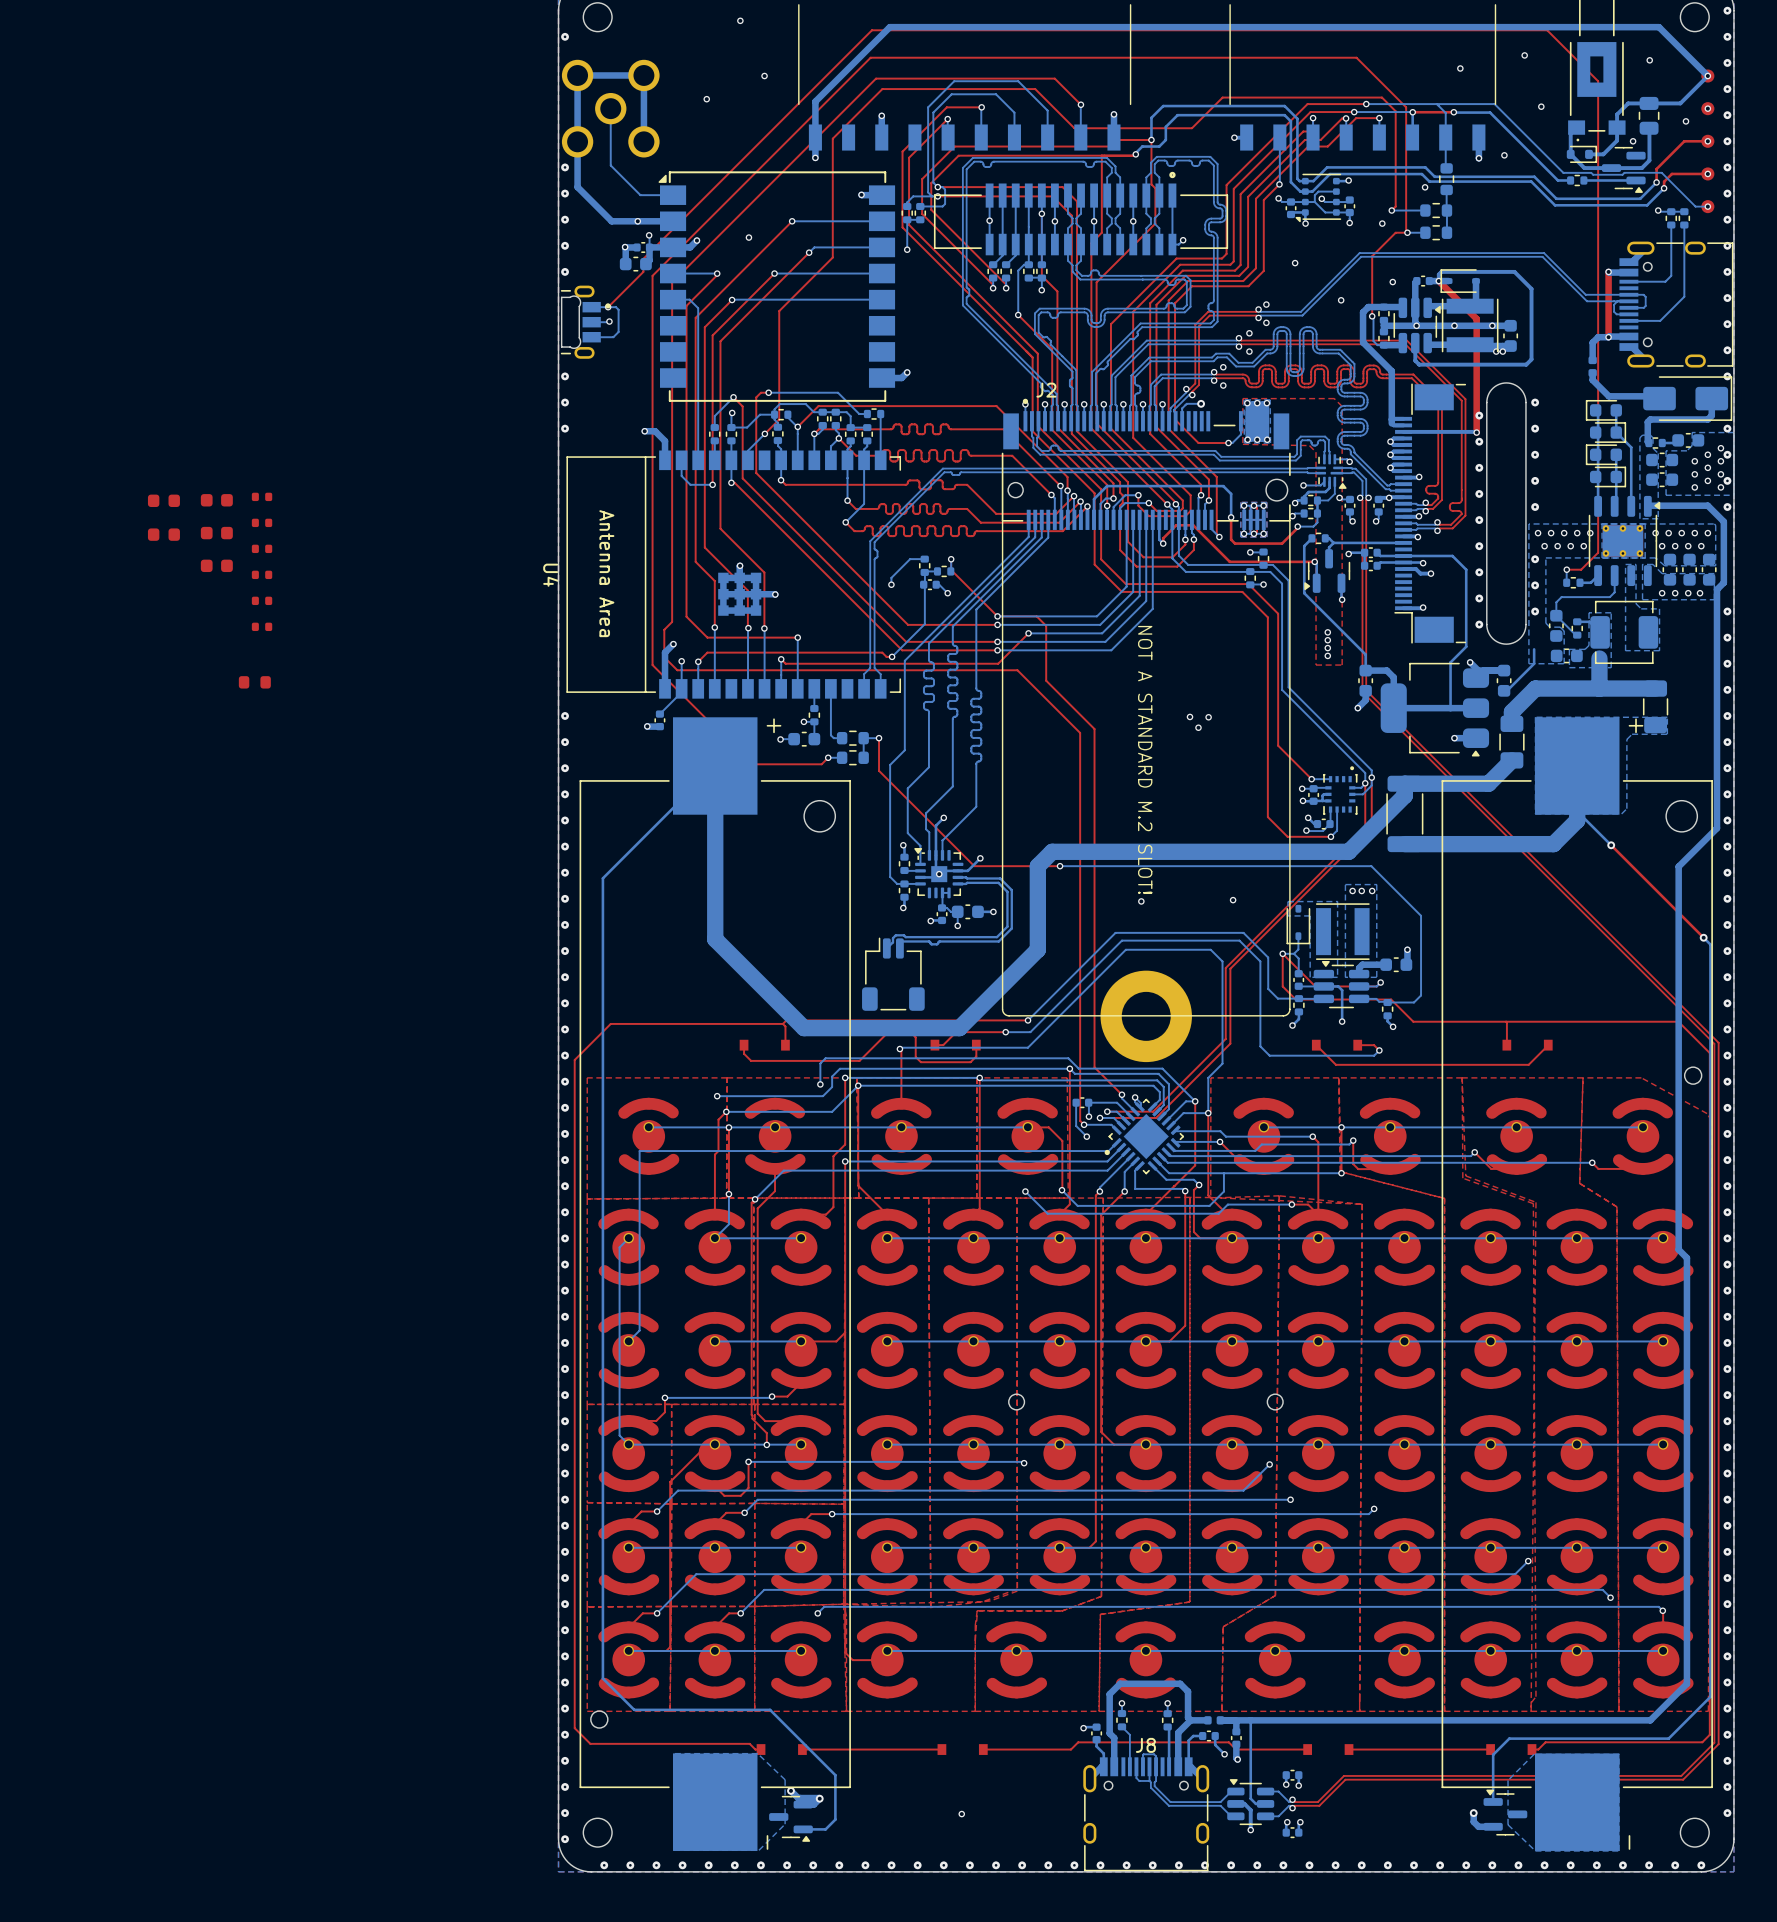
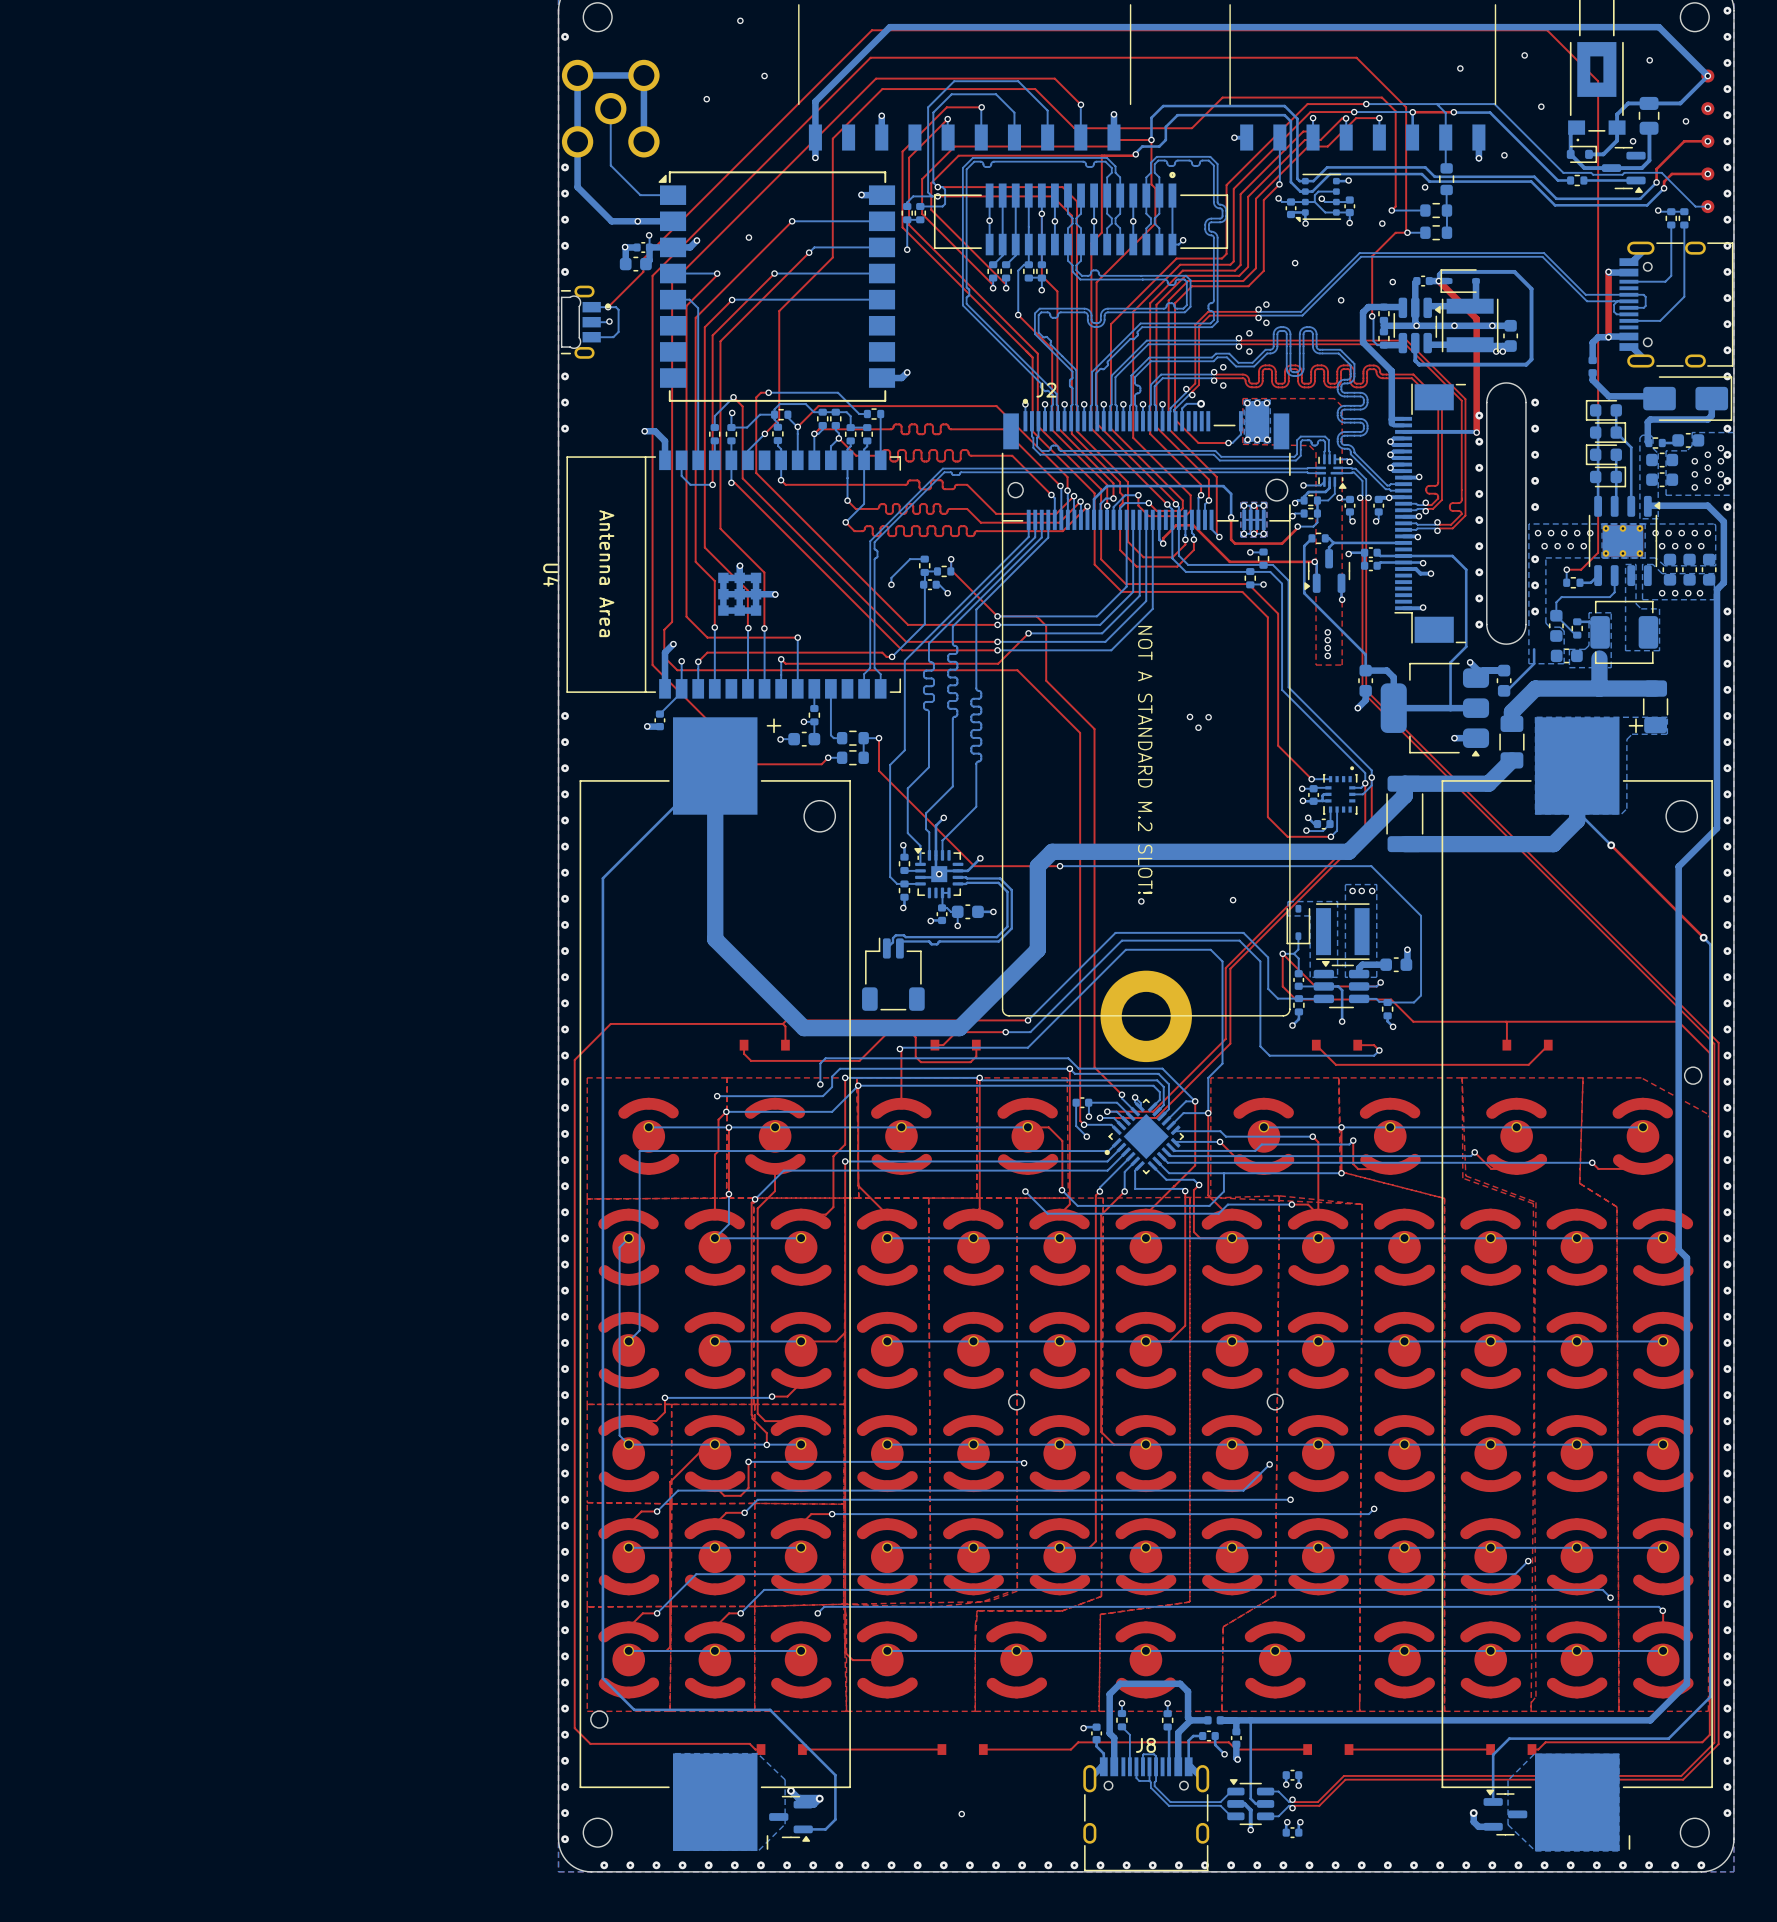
part: (262, 496) -> none
part: (163, 500) -> none
part: (216, 500) -> none
part: (262, 522) -> none
part: (216, 533) -> none
part: (163, 534) -> none
part: (262, 548) -> none
part: (216, 565) -> none
part: (262, 574) -> none
part: (262, 600) -> none
part: (262, 626) -> none
part: (254, 682) -> none

